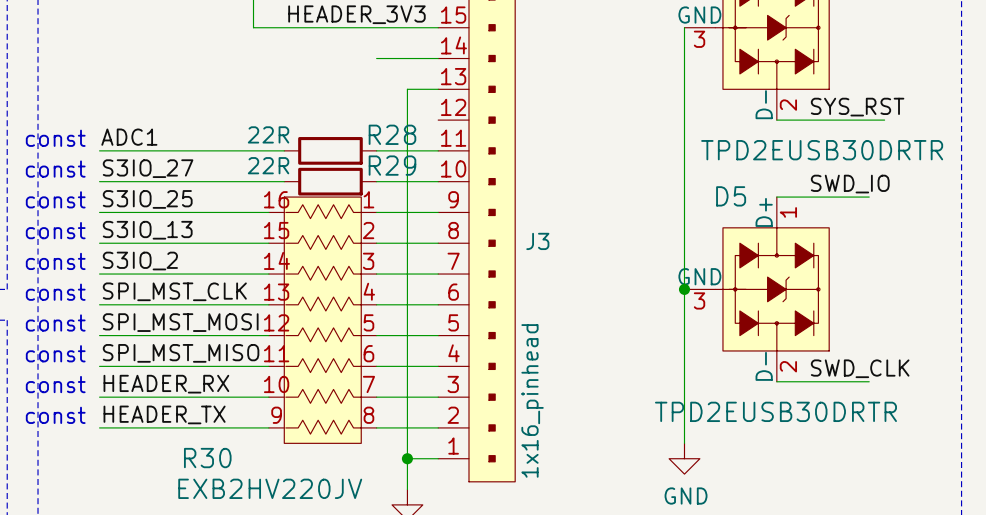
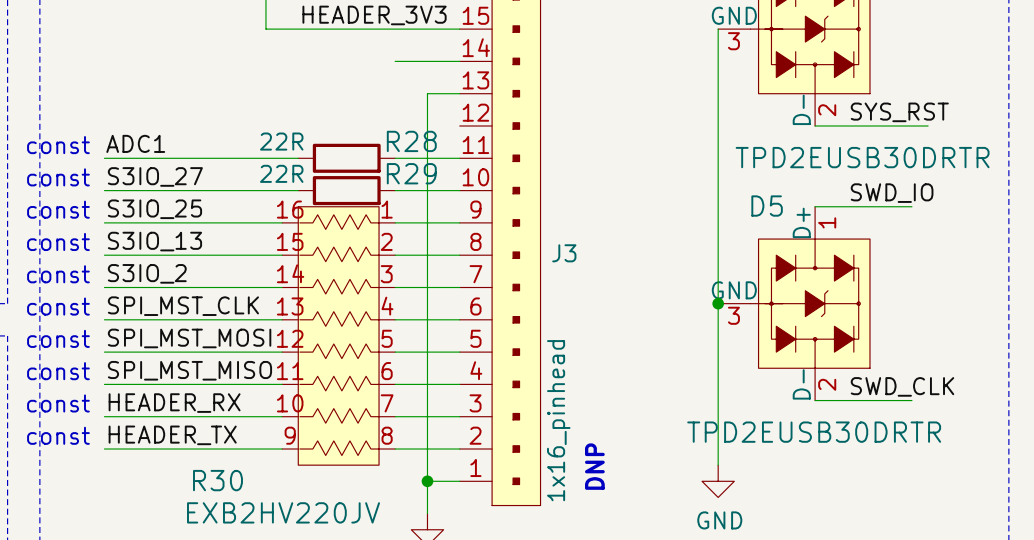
text: none -> DNP (594, 466)

